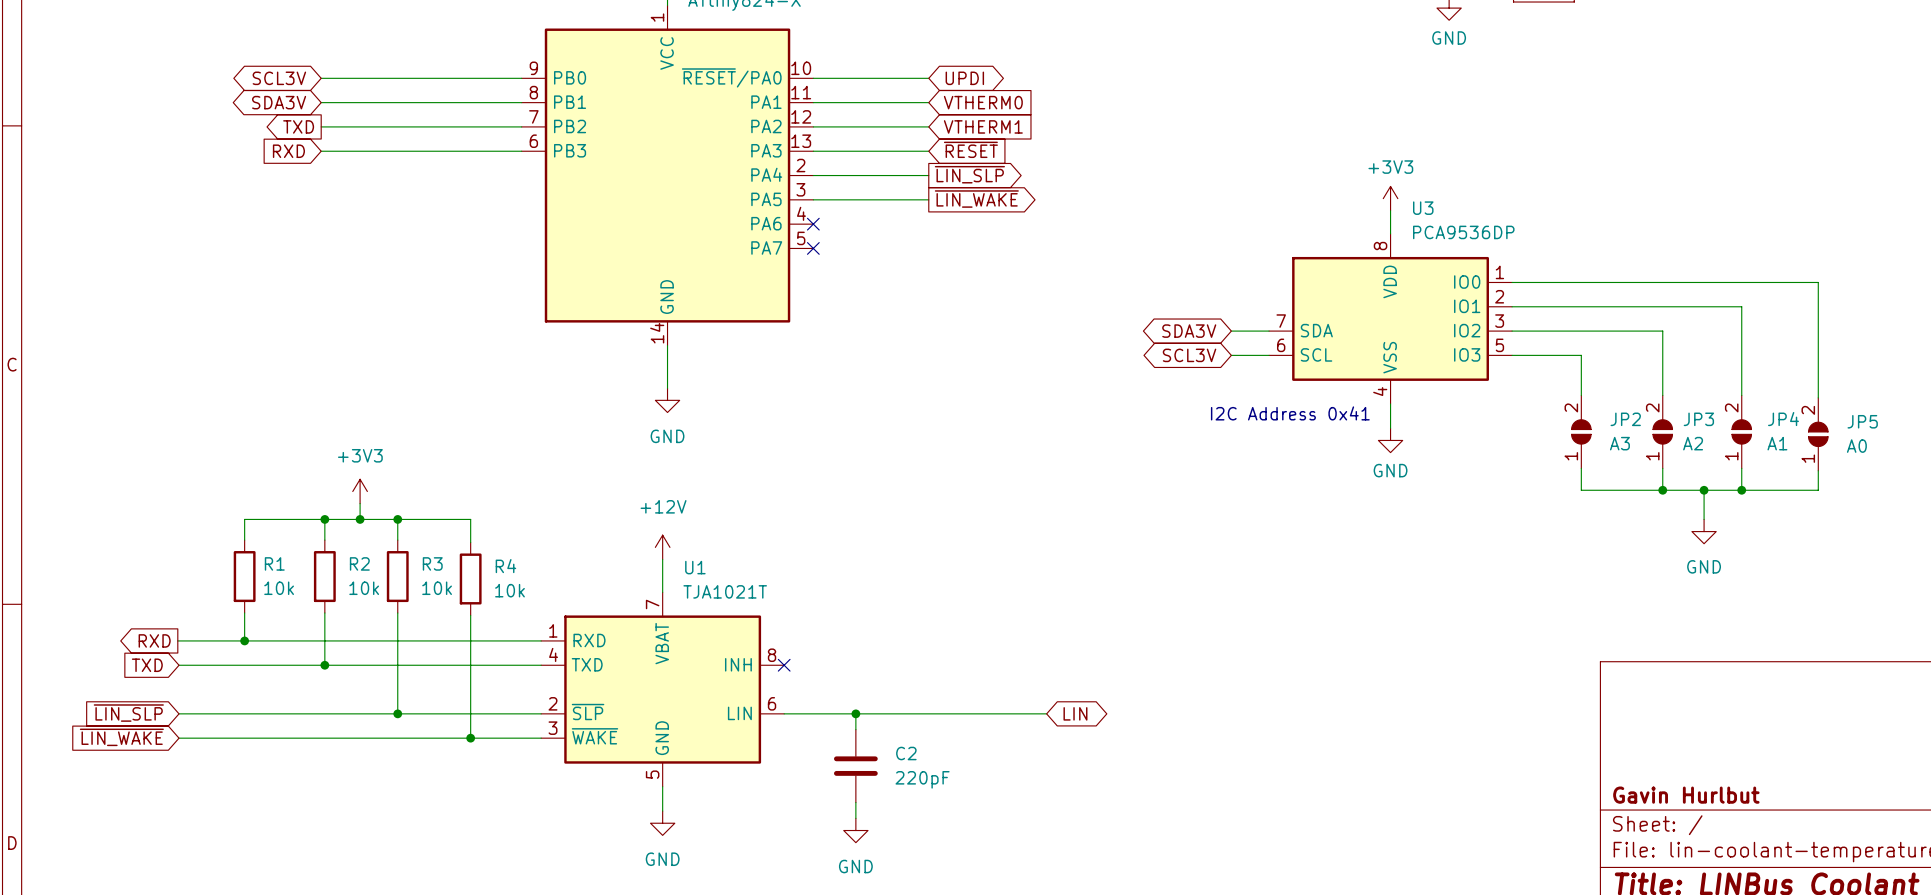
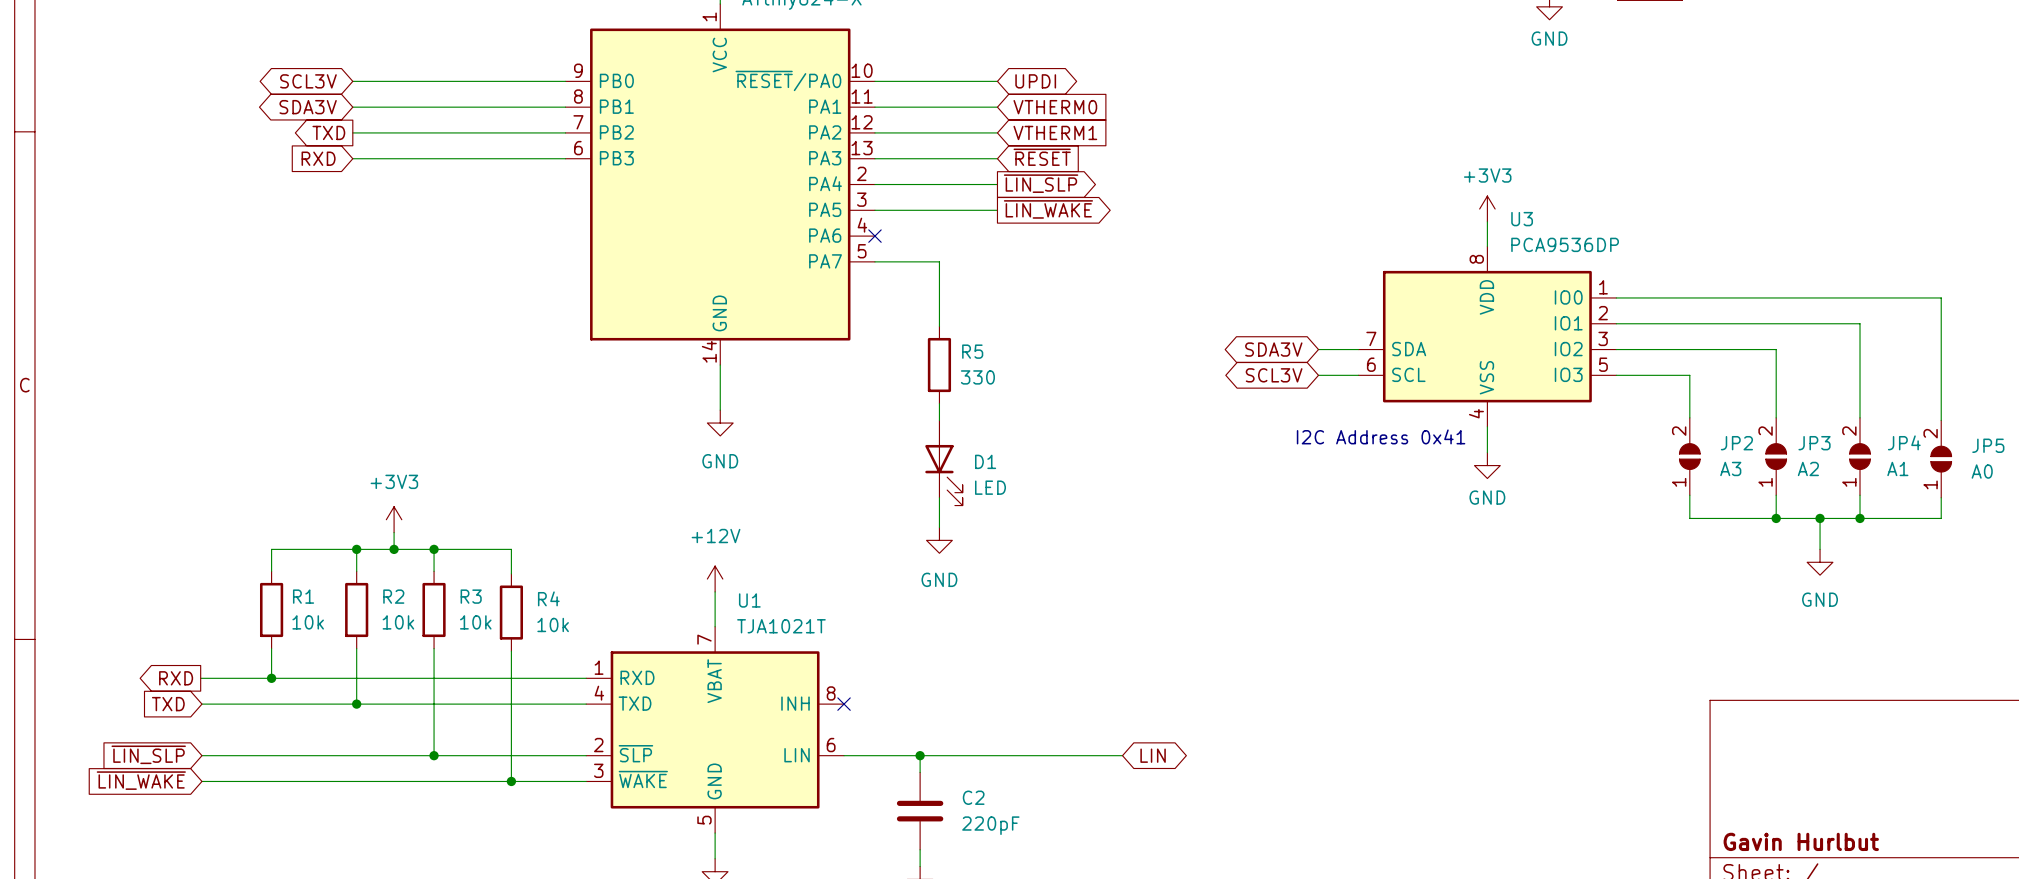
wire: none -> (874, 261) (939, 261) (939, 326)
no-connect mark: (813, 248) -> none
R5: none -> 330 (939, 365)
wire: none -> (939, 403) (939, 420)
D1: none -> LED (943, 463)
wire: none -> (939, 497) (939, 527)
power symbol: none -> GND (939, 540)

